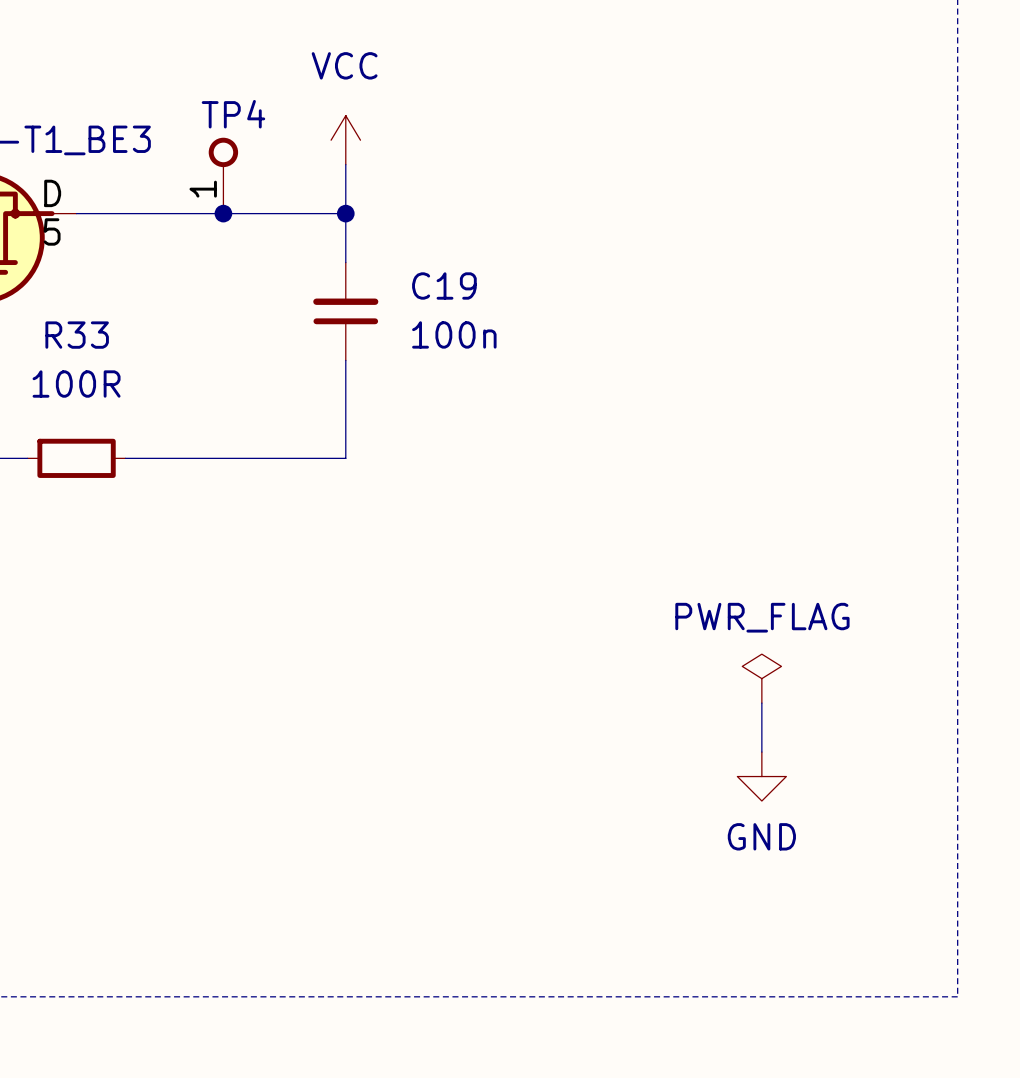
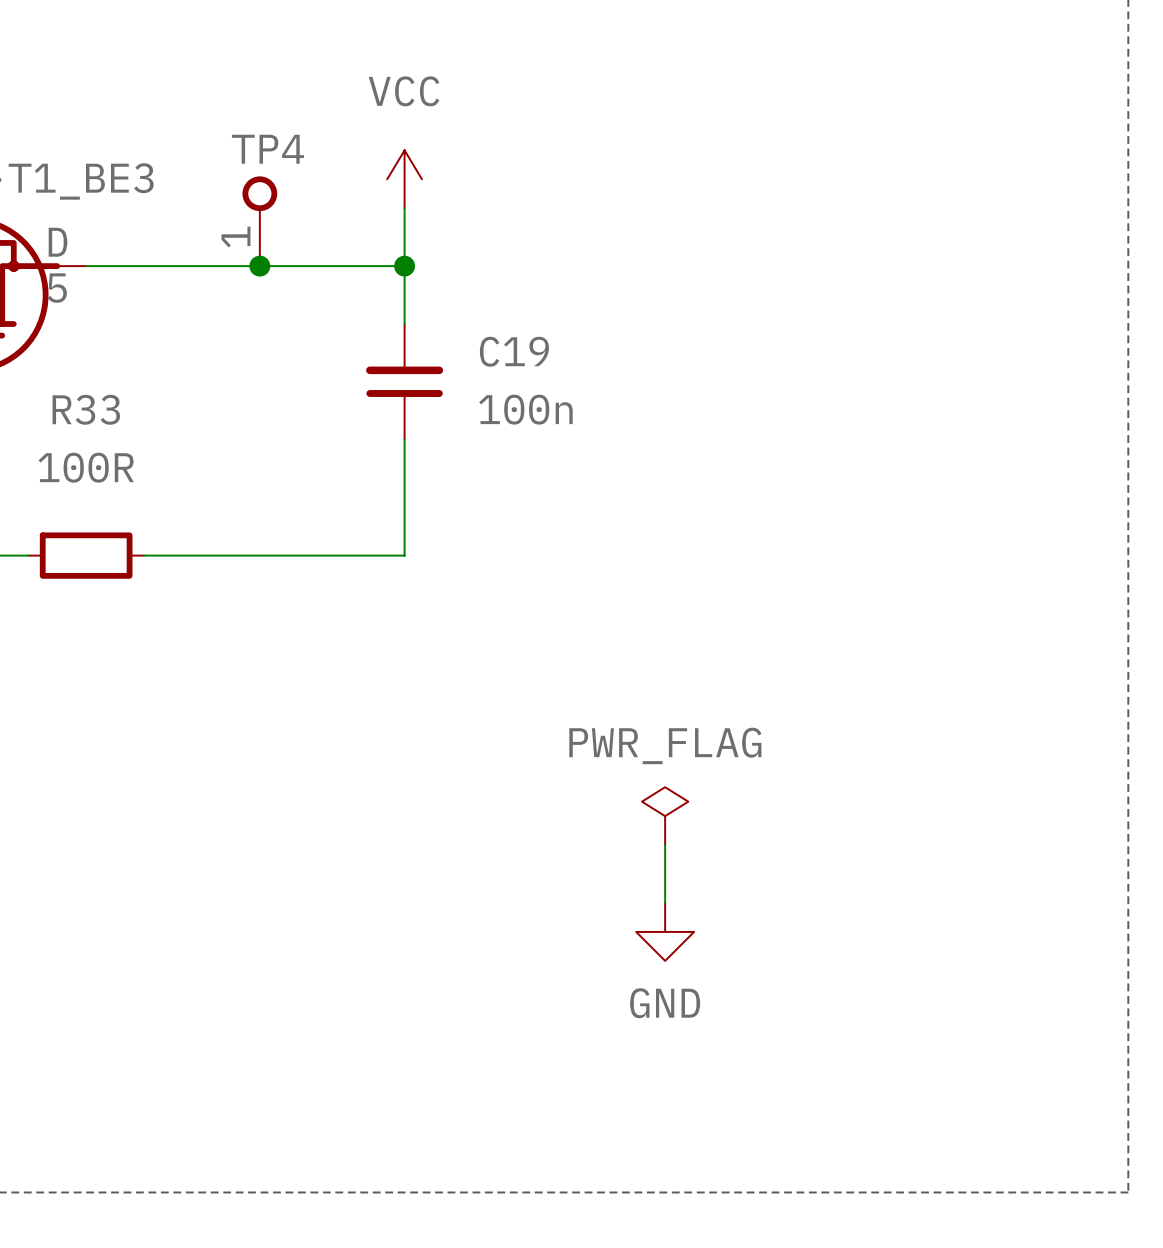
power symbol position: PWR_FLAG (761, 678) -> PWR_FLAG (665, 816)
wire: (761, 703) (761, 752) -> (665, 845) (665, 902)
power symbol position: GND (761, 776) -> GND (665, 931)

